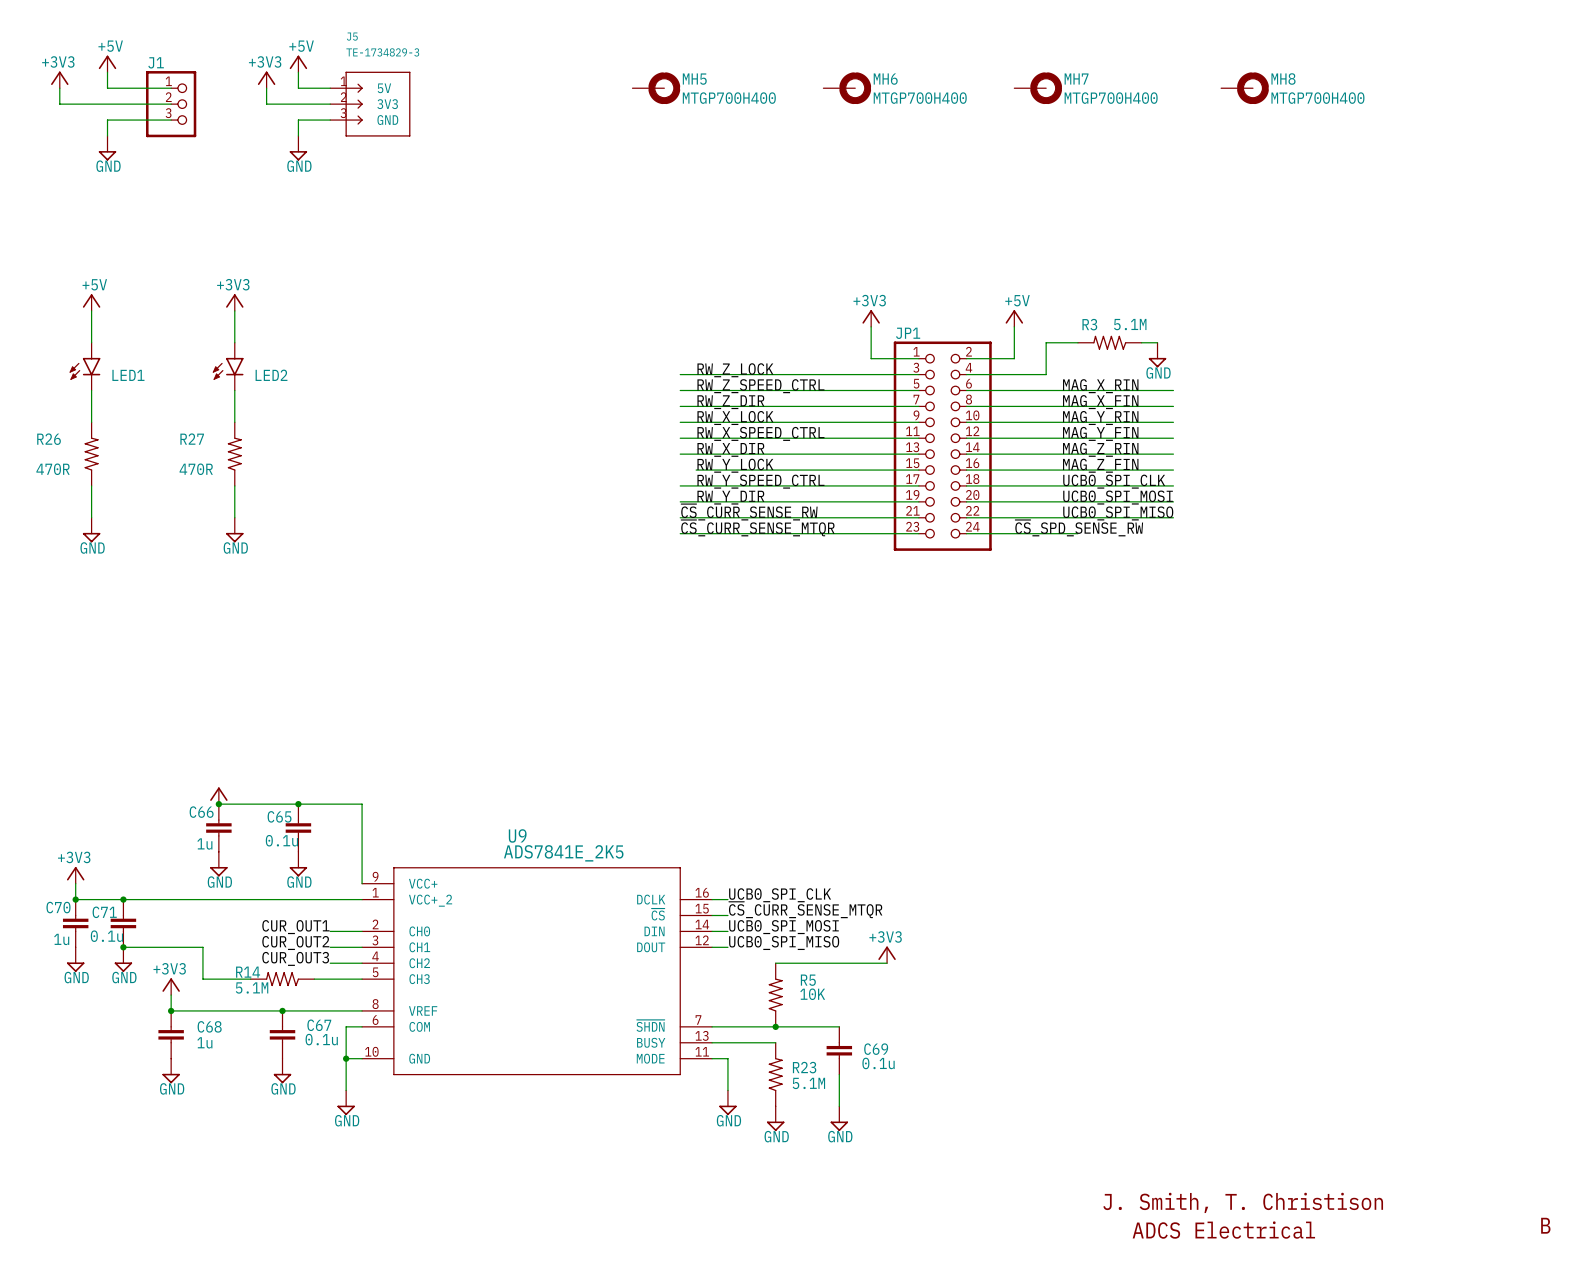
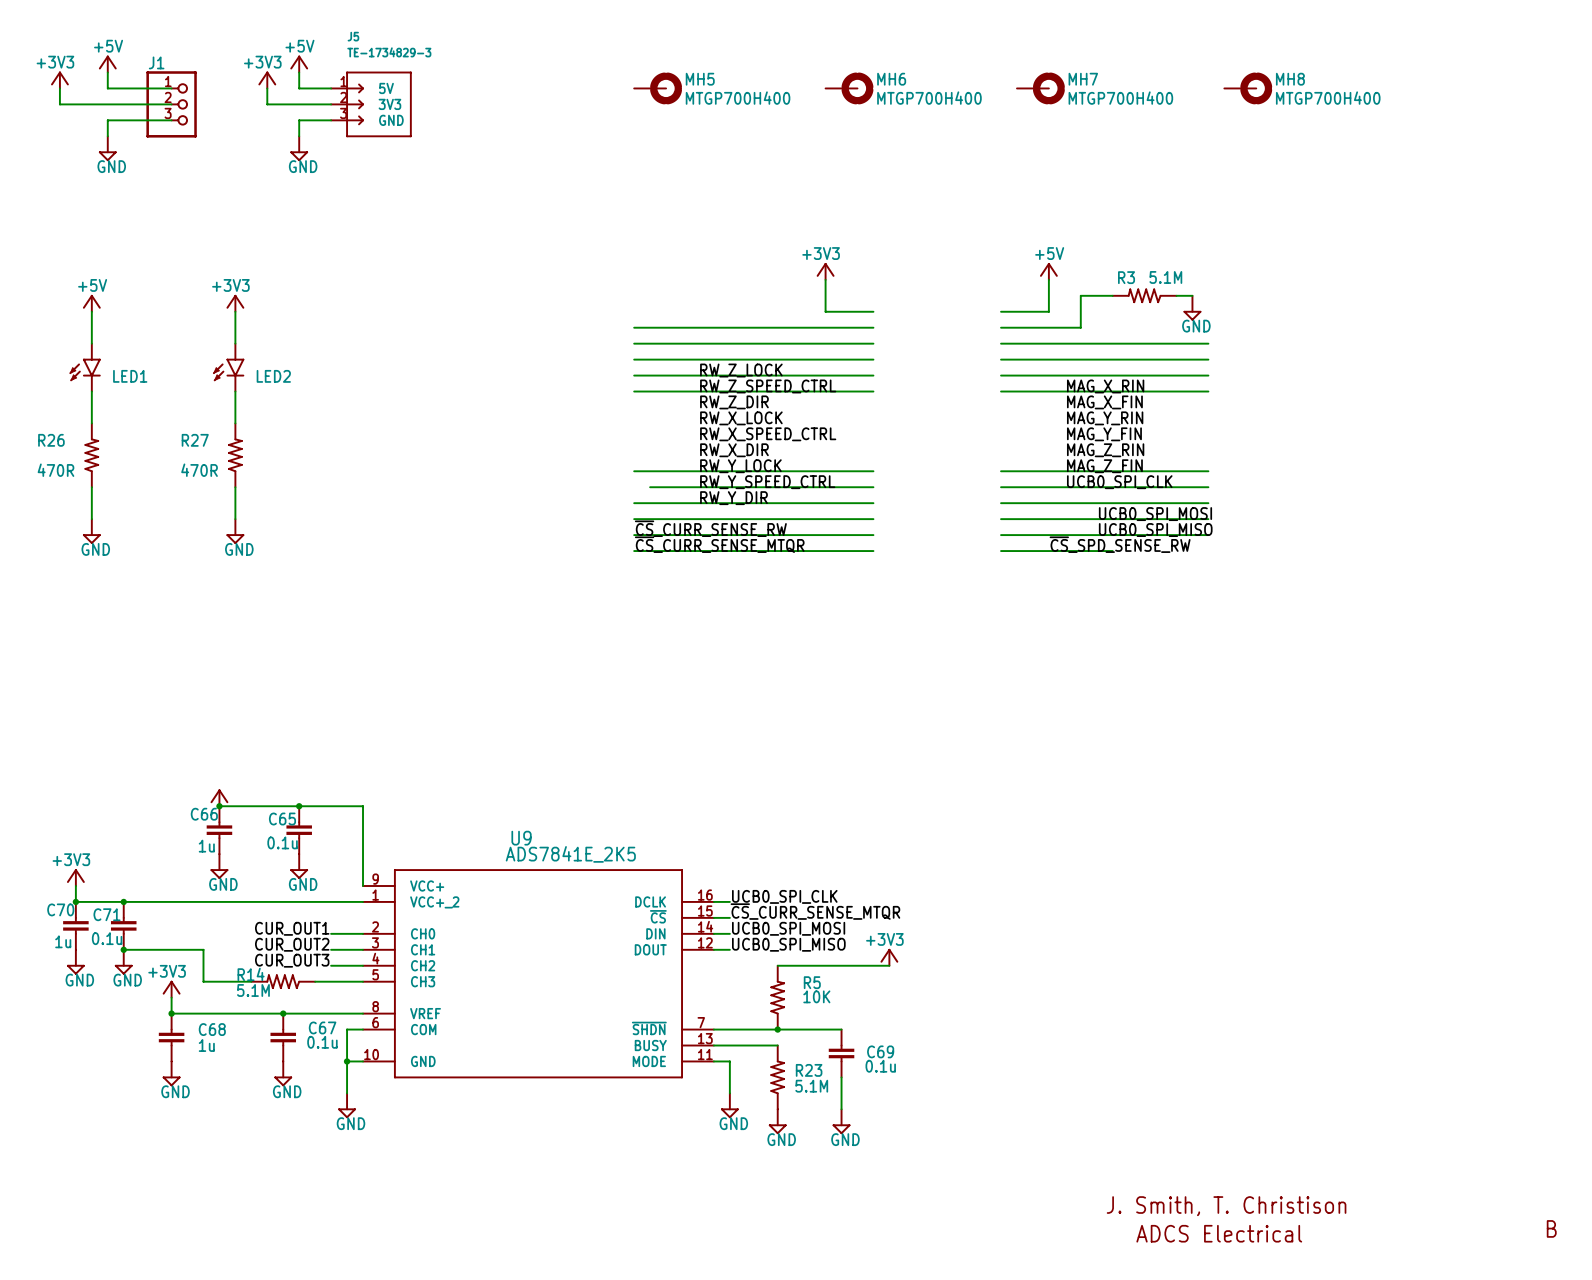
wire: none -> (825, 279) (825, 311) (873, 311)
wire: none -> (1048, 279) (1048, 311) (1001, 311)
wire: none -> (1112, 295) (1080, 295) (1080, 327) (1001, 327)
wire: none -> (1176, 295) (1192, 295)
power symbol position: +3V3 (871, 318) -> +3V3 (825, 271)
power symbol position: +5V (1014, 318) -> +5V (1048, 271)
wire: (871, 326) (871, 358) (918, 358) -> (873, 327) (634, 327)
wire: (1014, 326) (1014, 358) -> (1208, 359) (1016, 359)
wire: (1046, 342) (1046, 374) -> (1048, 343) (1001, 343)
R3 position: (1109, 342) -> (1144, 295)
wire: none -> (1160, 343) (1208, 343)
power symbol position: GND (1157, 355) -> GND (1192, 308)
wire: (966, 358) (998, 358) -> none
wire: none -> (634, 375) (682, 375)
wire: (871, 374) (918, 374) -> none
wire: (966, 374) (998, 374) -> none
wire: none -> (1048, 375) (1208, 375)
wire: none -> (634, 391) (682, 391)
wire: (871, 390) (918, 390) -> none
wire: (966, 390) (998, 390) -> none
wire: none -> (1176, 391) (1208, 391)
wire: (680, 406) (918, 406) -> none
wire: (966, 406) (1173, 406) -> none
wire: (680, 422) (918, 422) -> (634, 343) (873, 343)
wire: (966, 422) (1173, 422) -> none
wire: (680, 438) (918, 438) -> (634, 359) (873, 359)
wire: (966, 438) (1173, 438) -> none
JP1: (942, 446) -> none
wire: (680, 454) (918, 454) -> (634, 551) (873, 551)
wire: (966, 454) (1173, 454) -> none
wire: none -> (634, 471) (697, 471)
wire: (871, 470) (918, 470) -> none
wire: (966, 470) (998, 470) -> none
wire: none -> (1176, 471) (1208, 471)
wire: none -> (650, 487) (682, 487)
wire: (871, 485) (918, 485) -> none
wire: (966, 485) (998, 485) -> none
wire: none -> (1176, 487) (1208, 487)
label position: UCB0_SPI_MOSI (1118, 497) -> UCB0_SPI_MOSI (1155, 514)
wire: none -> (634, 503) (682, 503)
wire: (871, 501) (918, 501) -> none
wire: (966, 501) (998, 501) -> none
wire: none -> (1176, 503) (1208, 503)
label position: ~{CS}_CURR_SENSE_RW (749, 512) -> ~{CS}_CURR_SENSE_RW (710, 528)
label position: UCB0_SPI_MISO (1118, 513) -> UCB0_SPI_MISO (1155, 530)
wire: none -> (634, 519) (682, 519)
wire: (871, 517) (918, 517) -> none
wire: (966, 517) (998, 517) -> none
wire: none -> (1176, 519) (1208, 519)
label position: ~{CS}_CURR_SENSE_MTQR (757, 528) -> ~{CS}_CURR_SENSE_MTQR (719, 544)
label position: ~{CS}_SPD_SENSE_RW (1079, 528) -> ~{CS}_SPD_SENSE_RW (1120, 544)
wire: none -> (634, 535) (682, 535)
wire: (871, 533) (918, 533) -> none
wire: (966, 533) (998, 533) -> none
wire: none -> (1080, 535) (1208, 535)
wire: none -> (1001, 551) (1112, 551)

